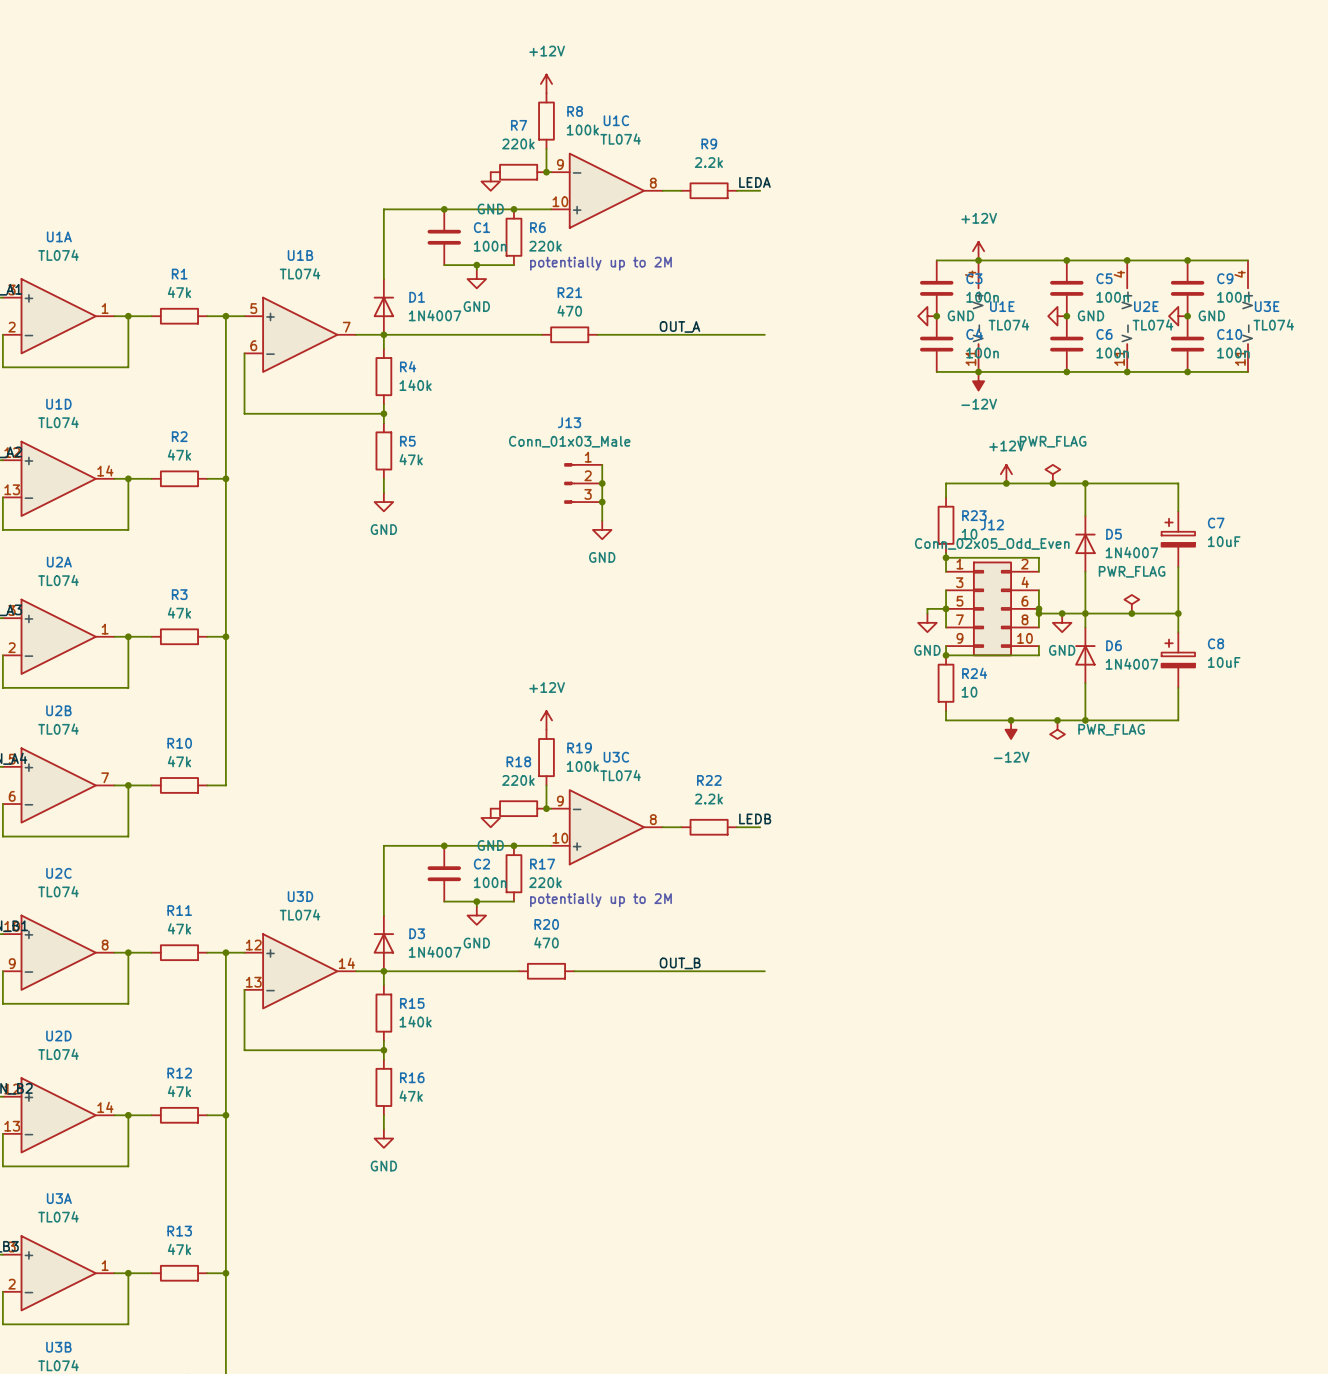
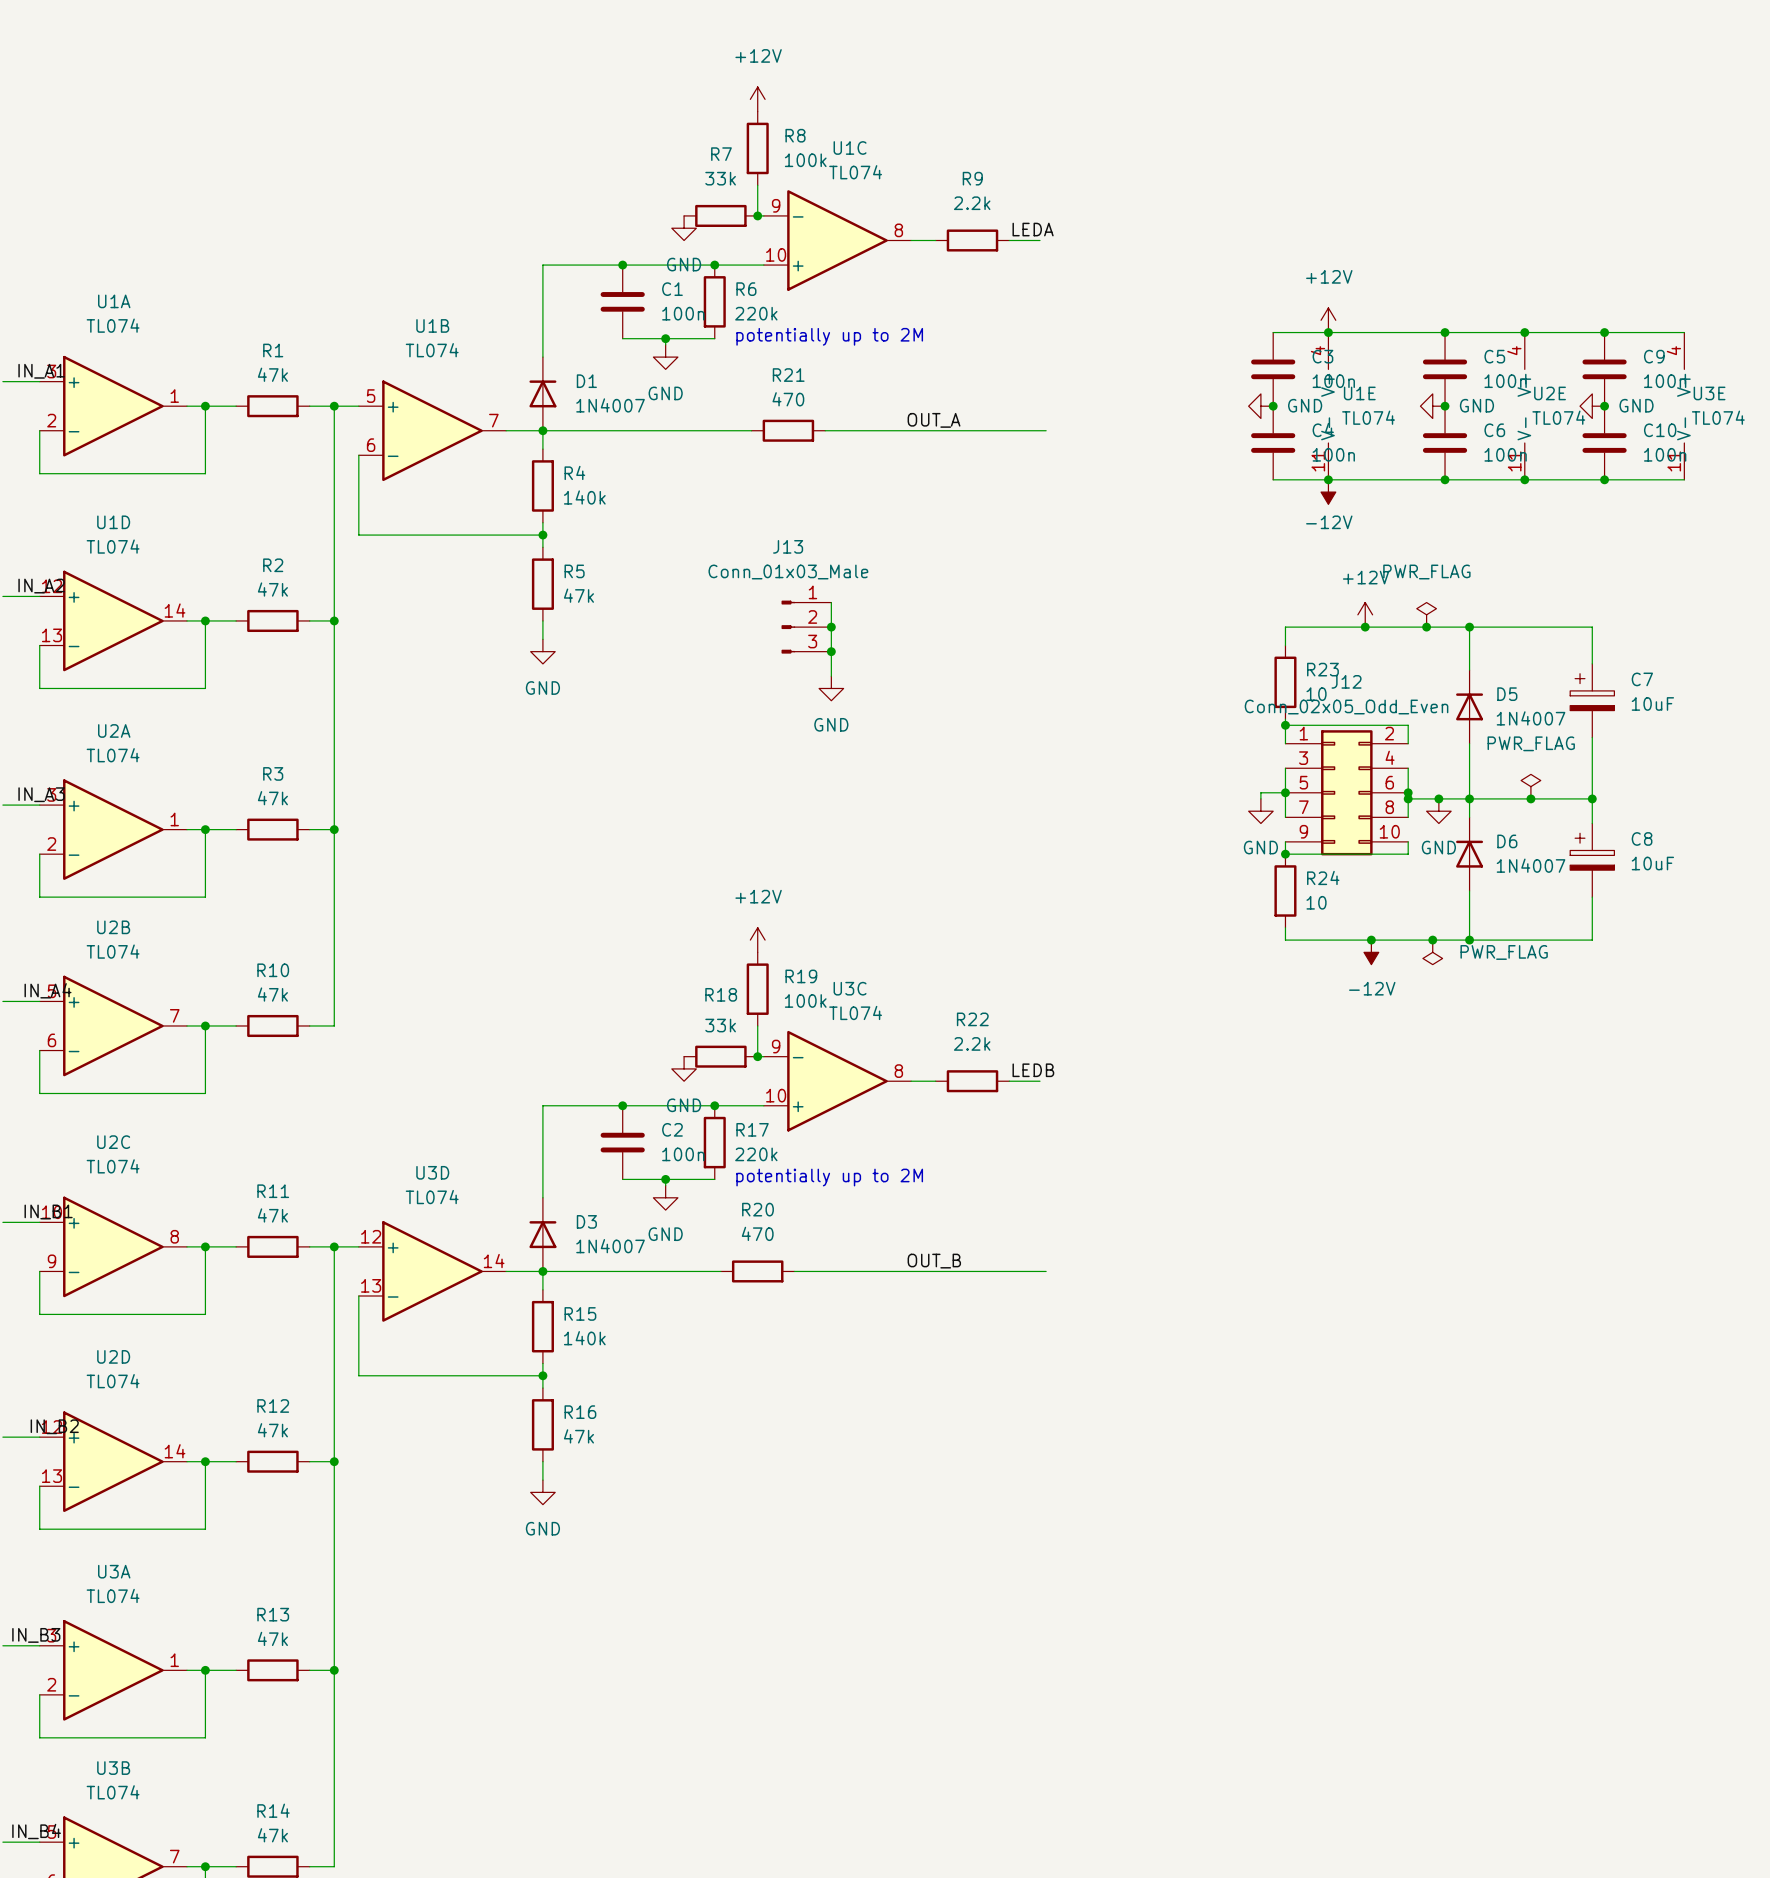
R7 value: 220k (518, 143) -> 33k (720, 178)
R18 value: 220k (518, 780) -> 33k (720, 1025)

